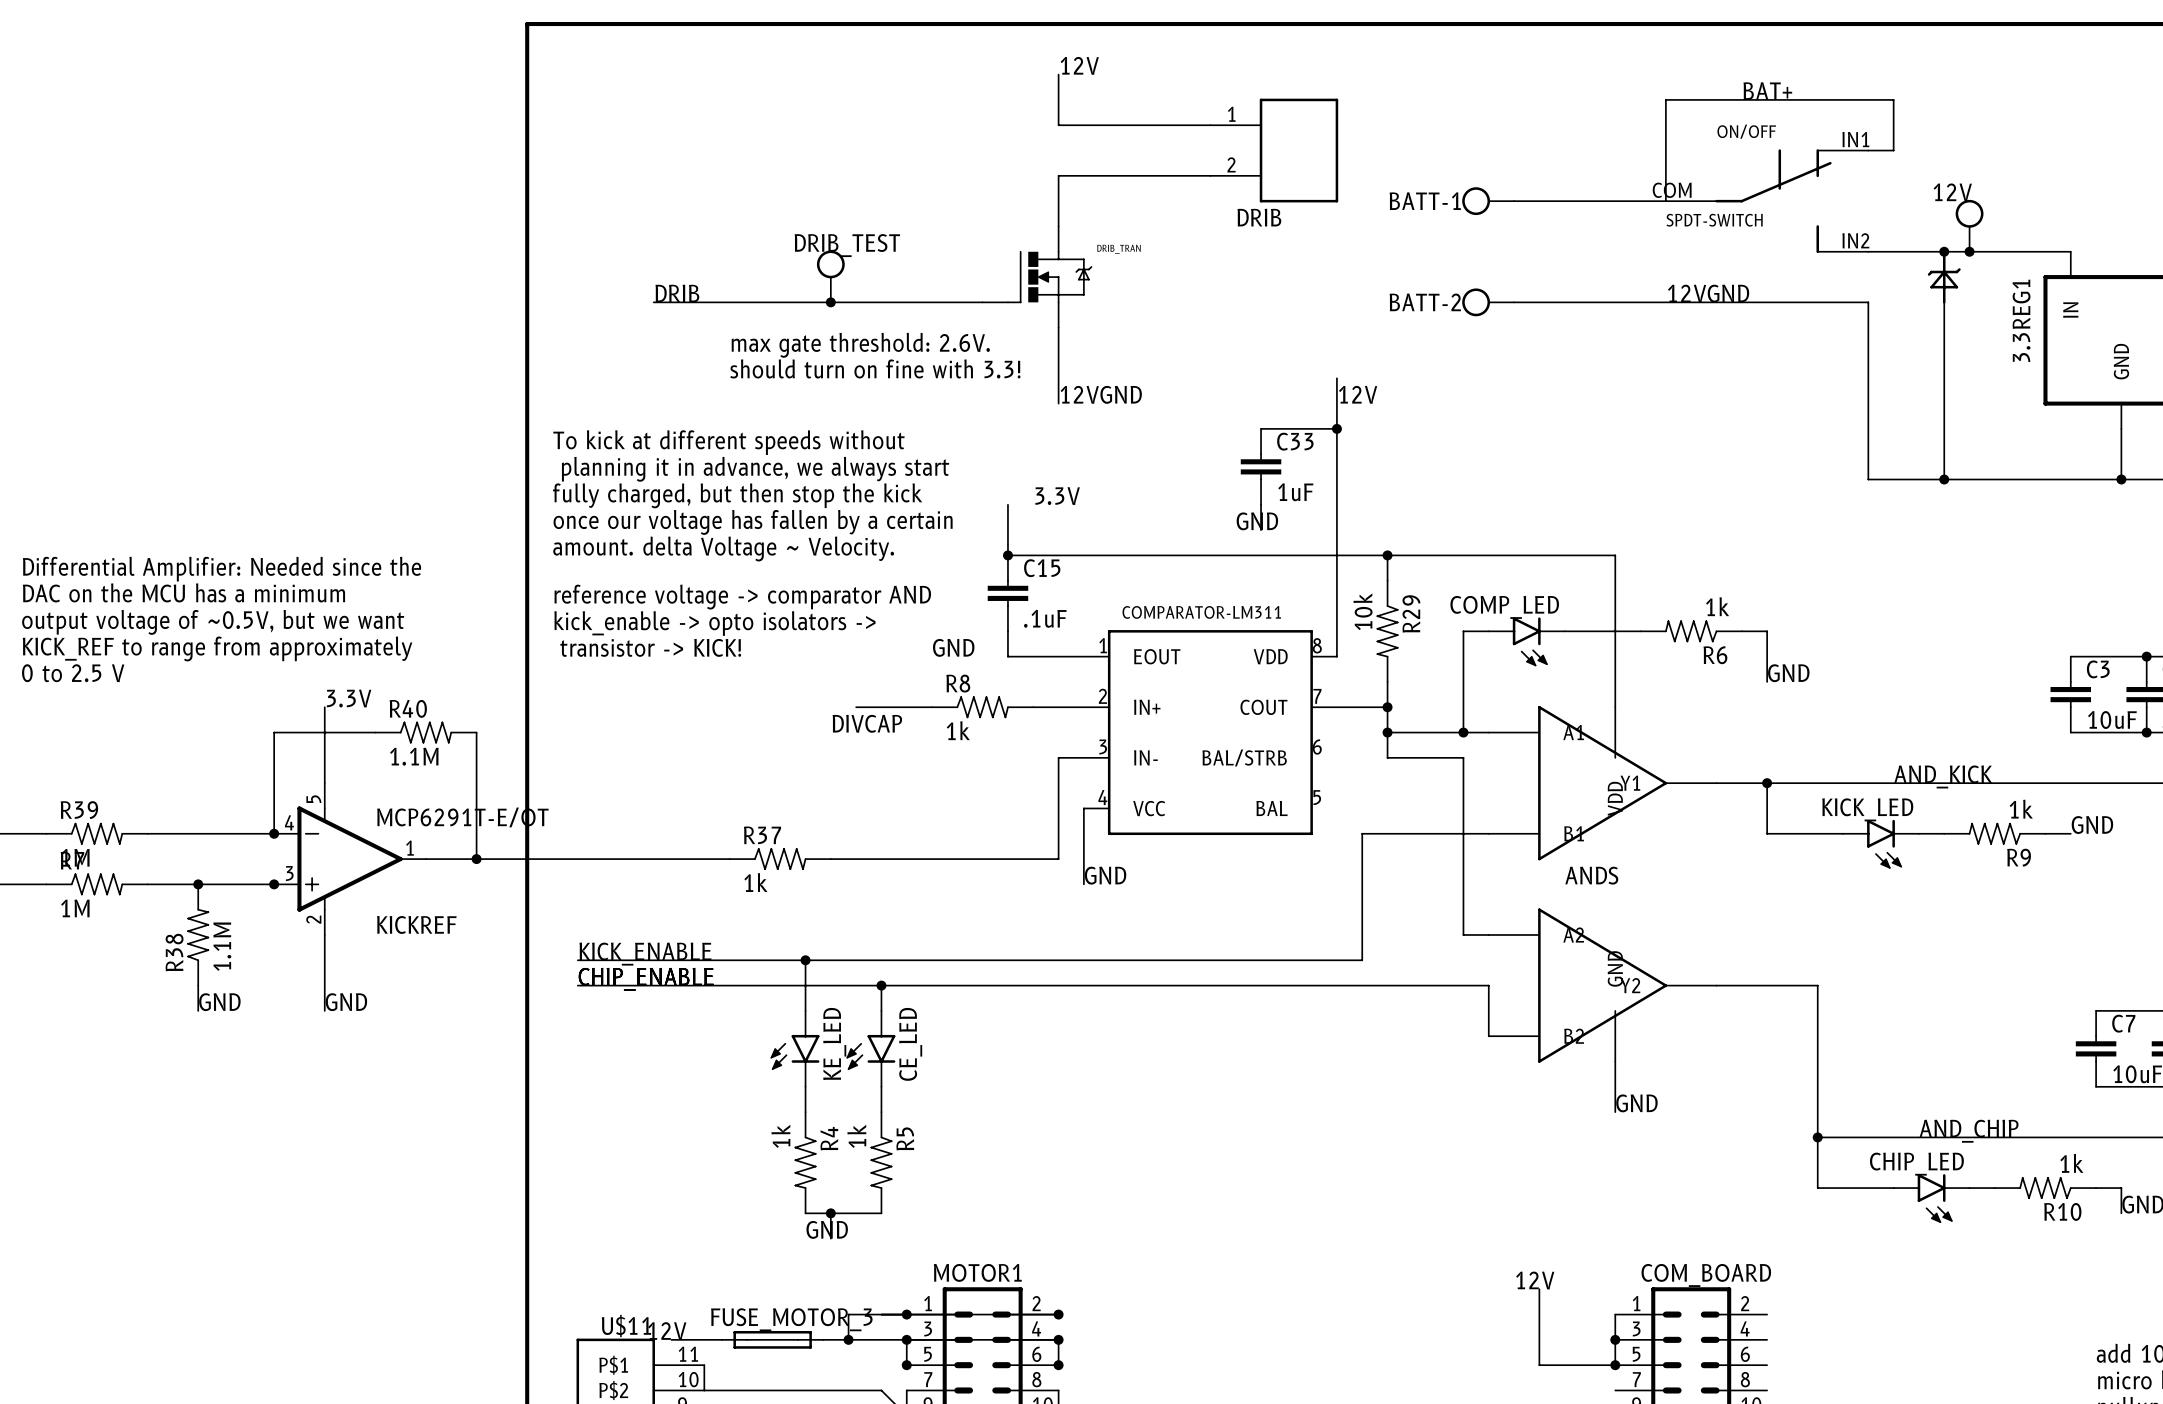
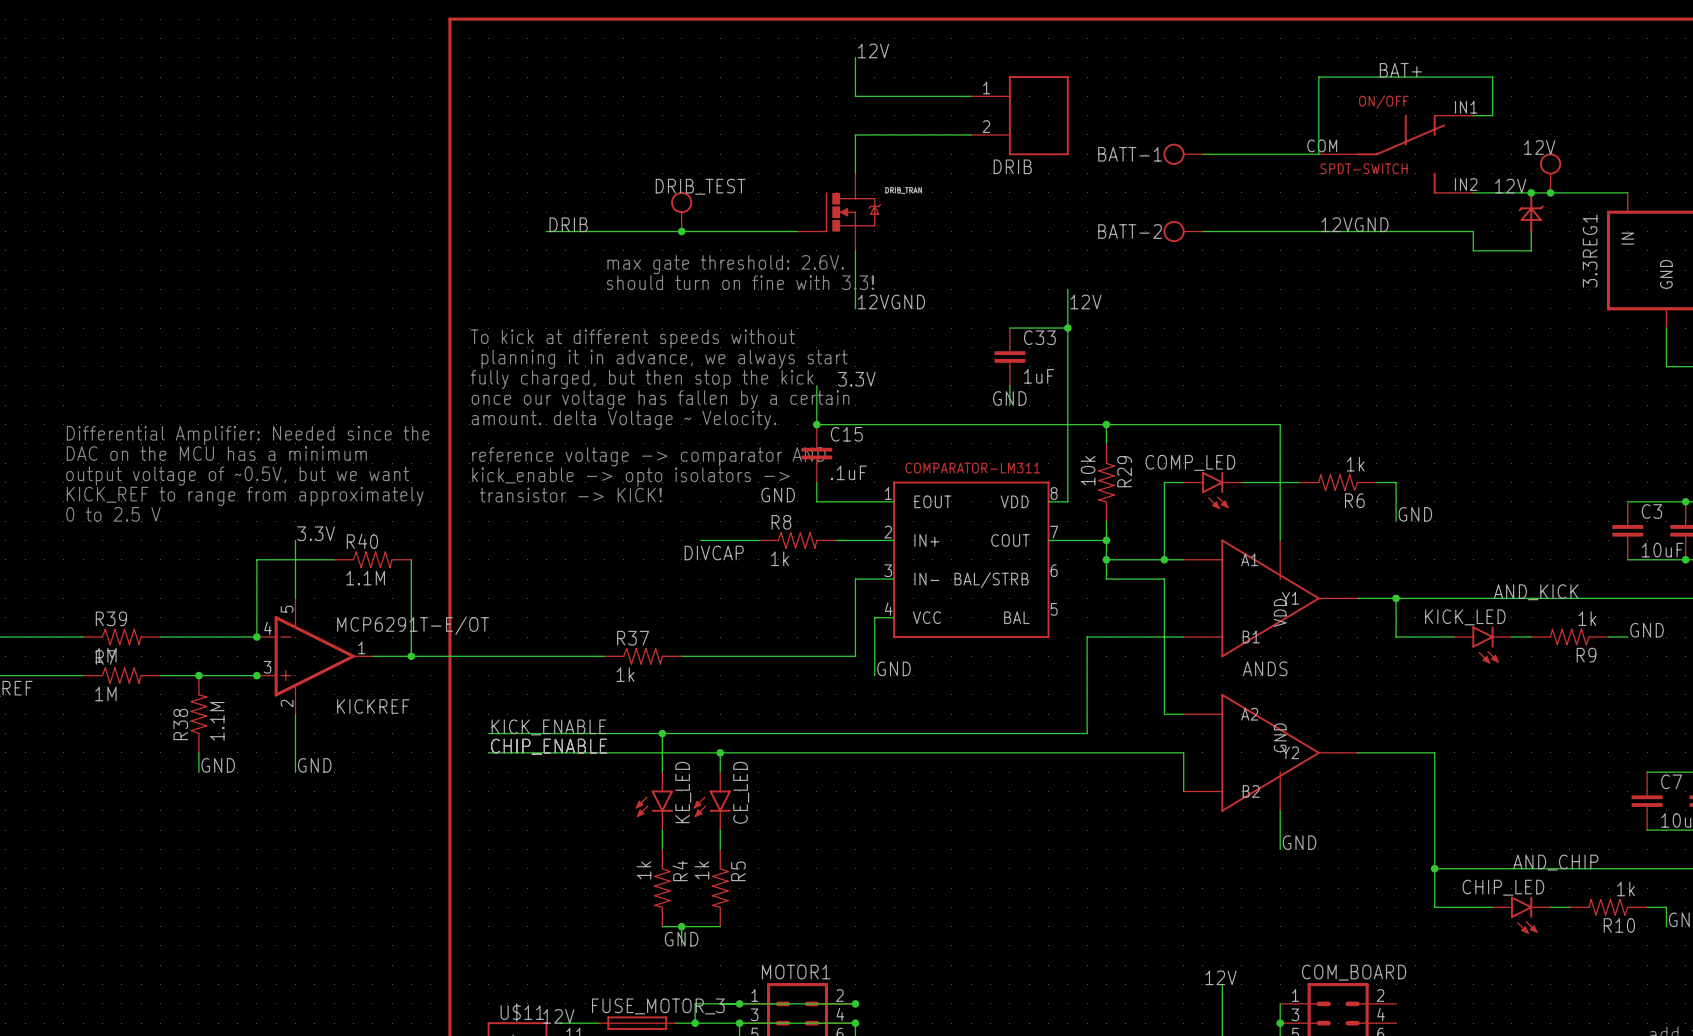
label: none -> 12V (1510, 186)
wire: (1868, 327) (1868, 479) (2121, 479) -> none
wire: (1944, 327) (1944, 479) -> (1531, 250) (1473, 250)
junction: (1944, 479) -> none
junction: (2121, 479) -> none

